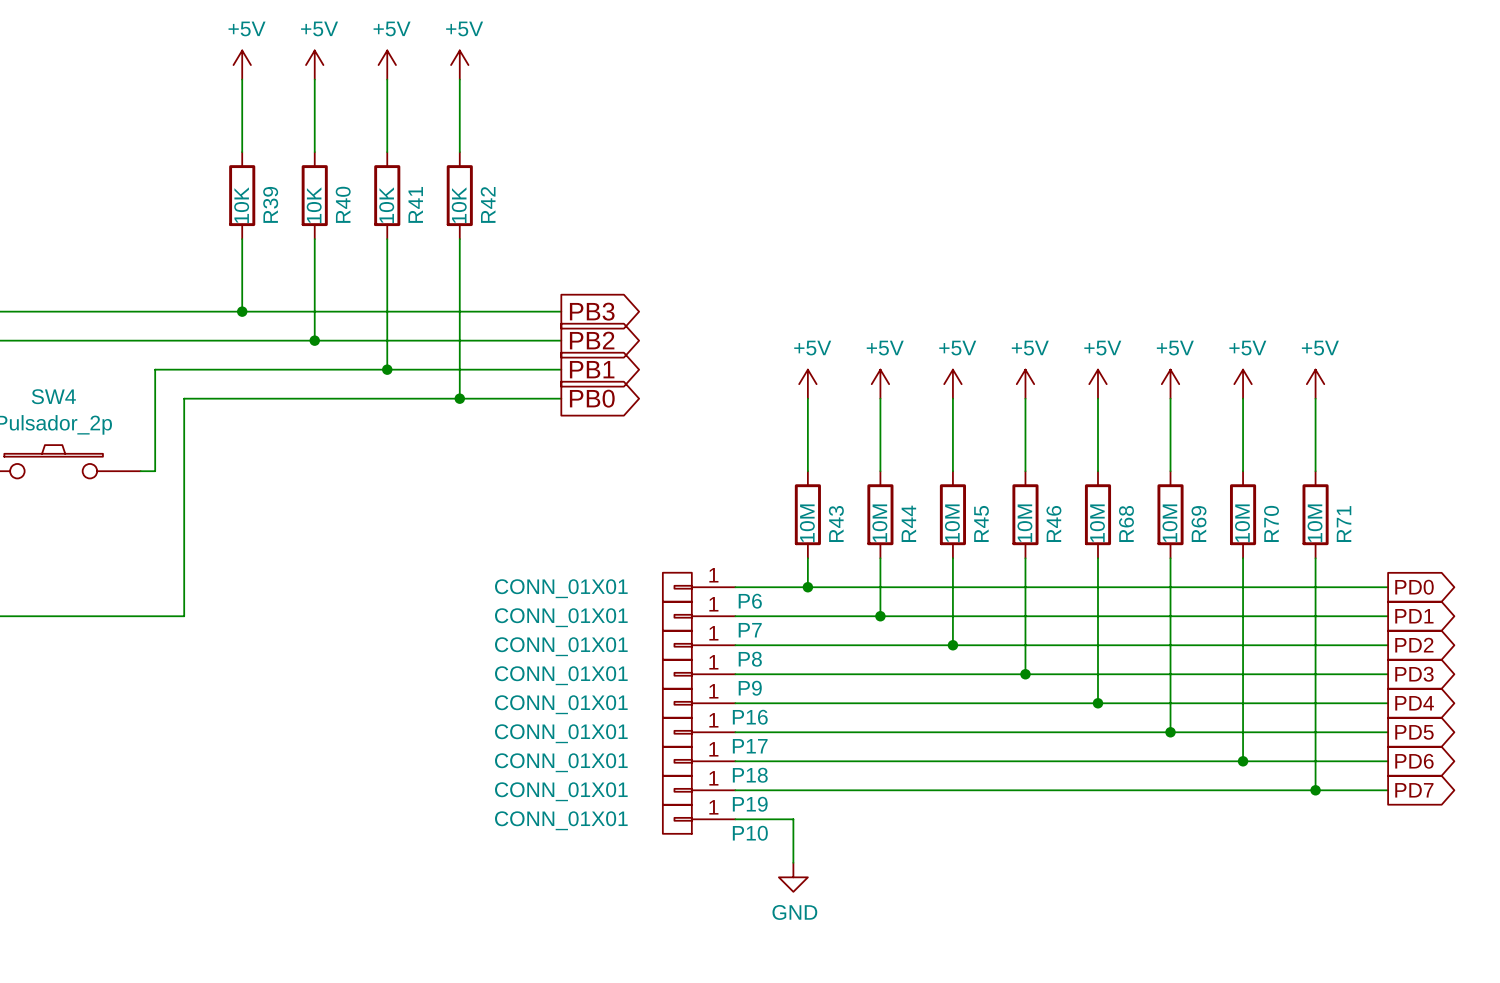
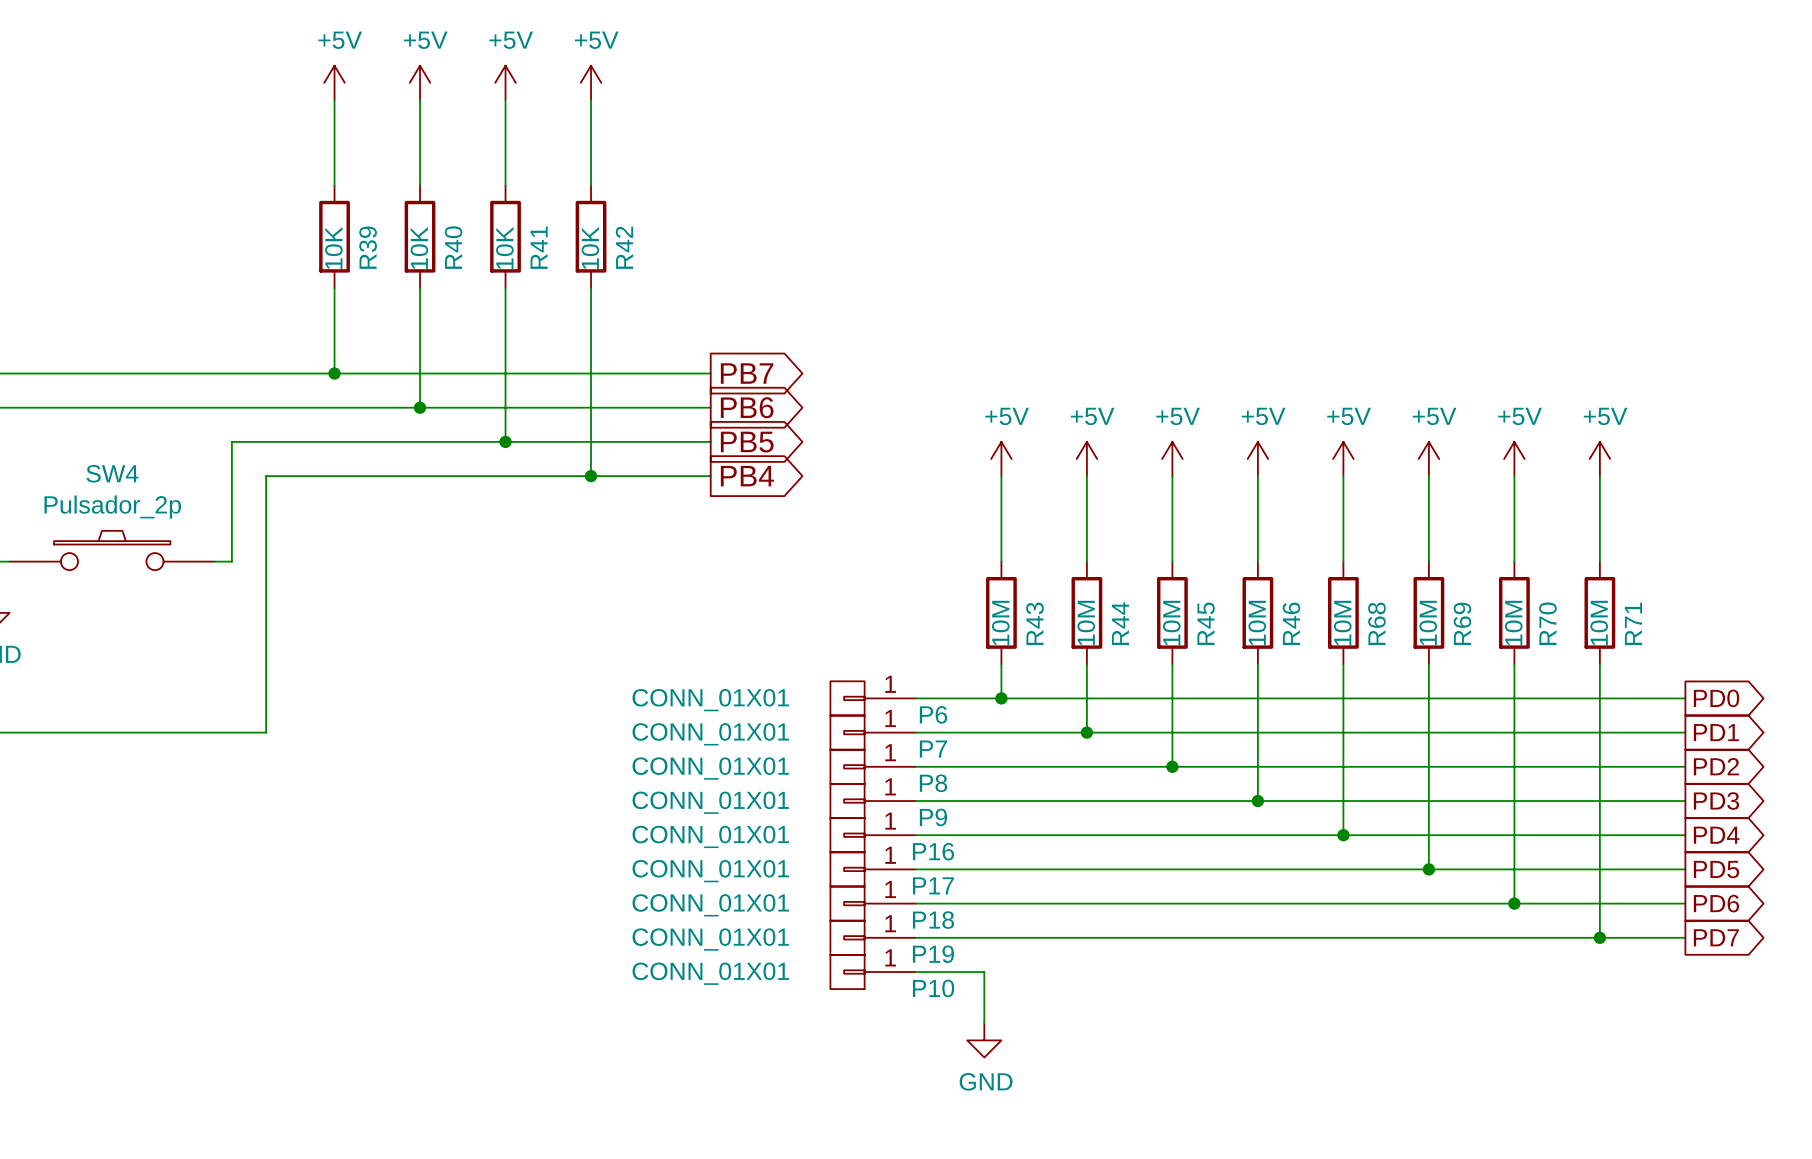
global label: PB3 (592, 311) -> PB7 (747, 373)
global label: PB2 (592, 340) -> PB6 (747, 407)
global label: PB1 (592, 369) -> PB5 (747, 442)
global label: PB0 (592, 398) -> PB4 (747, 476)

